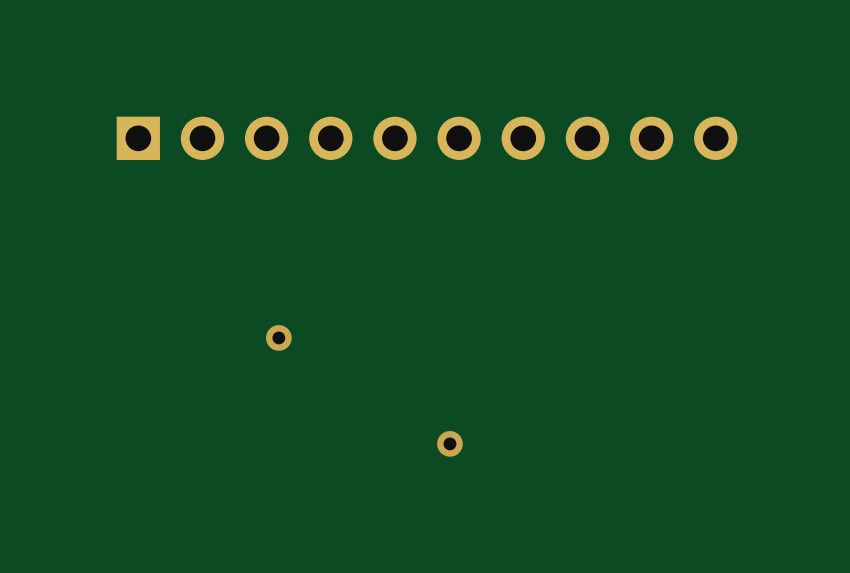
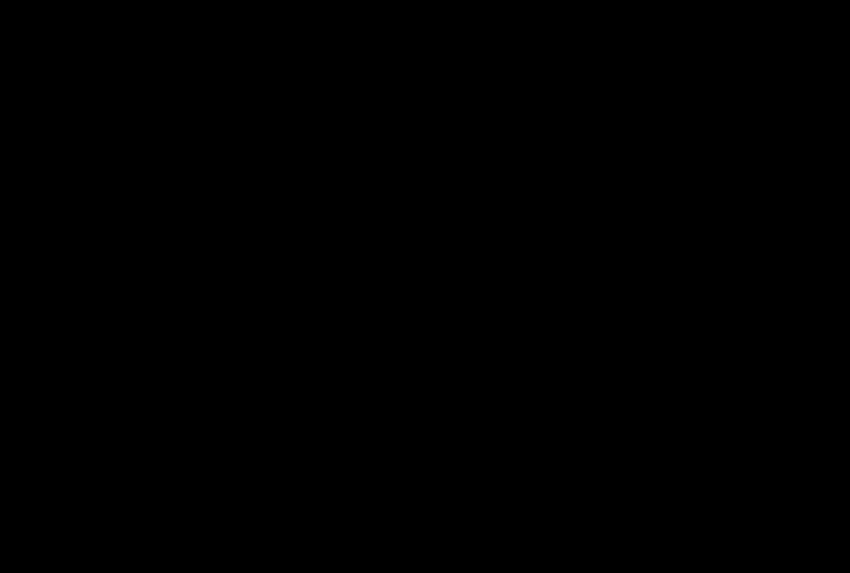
part: (427, 138) -> none
via: (278, 337) -> none
via: (449, 443) -> none

